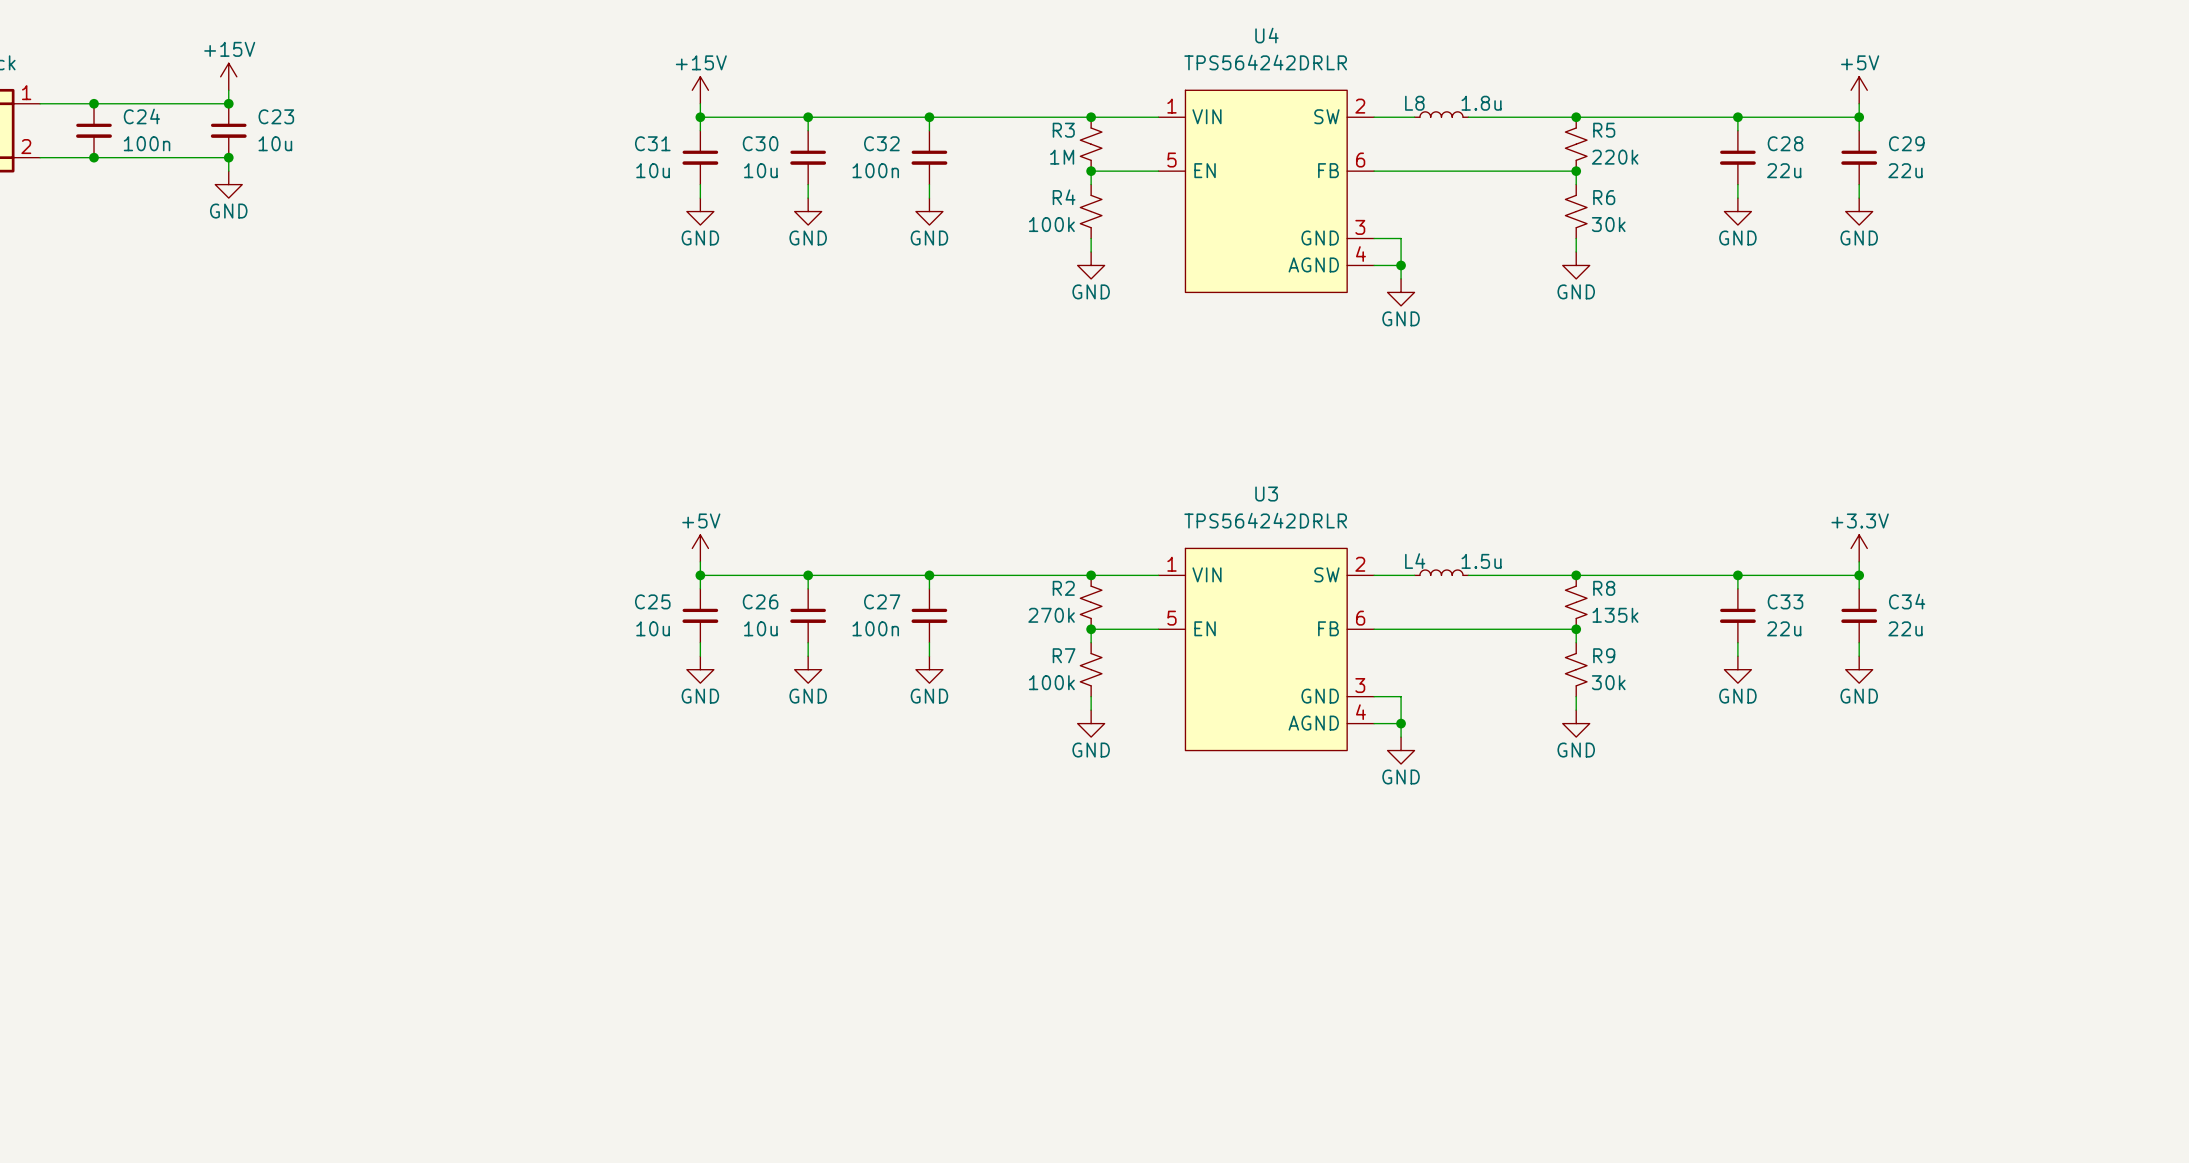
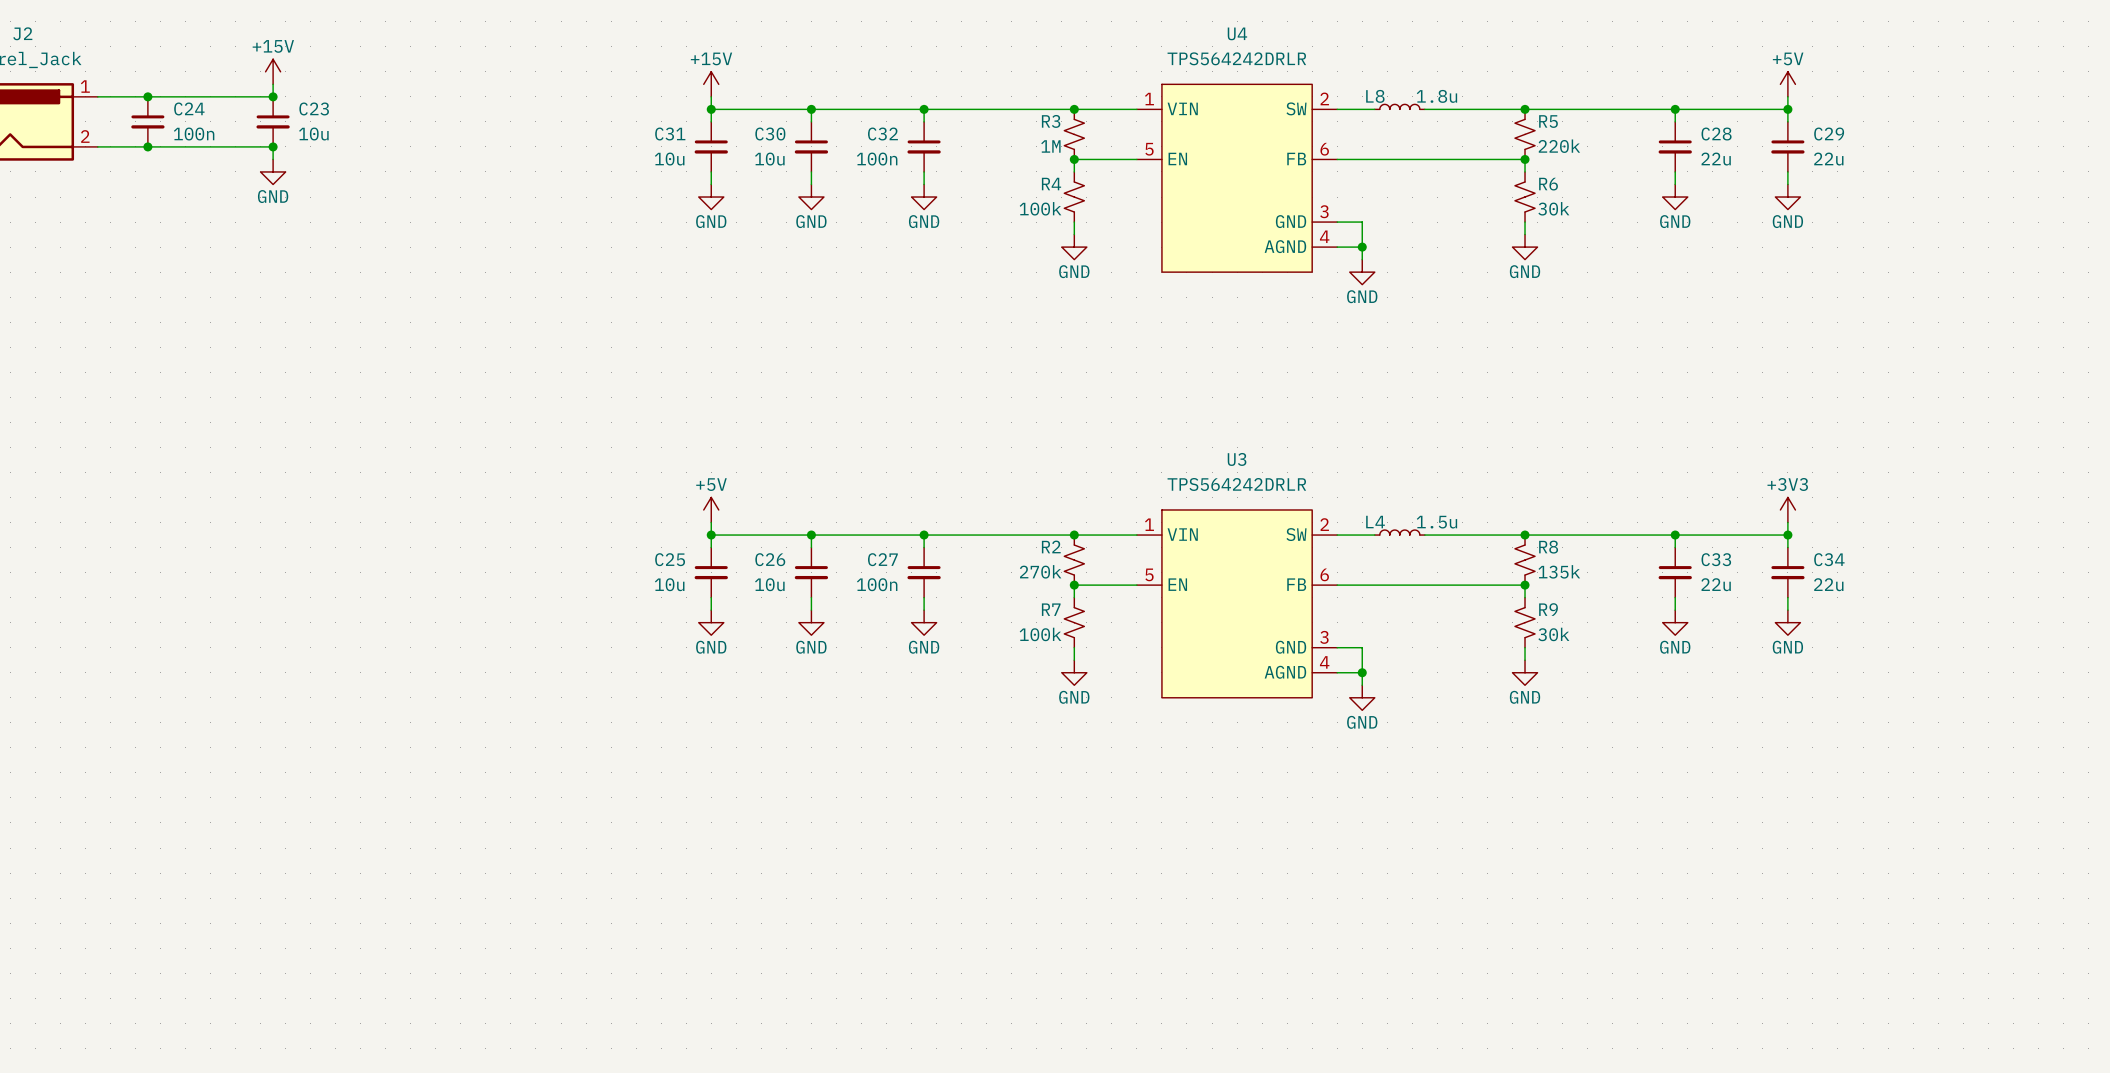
power symbol: +3.3V (1859, 548) -> +3V3 (1787, 509)

